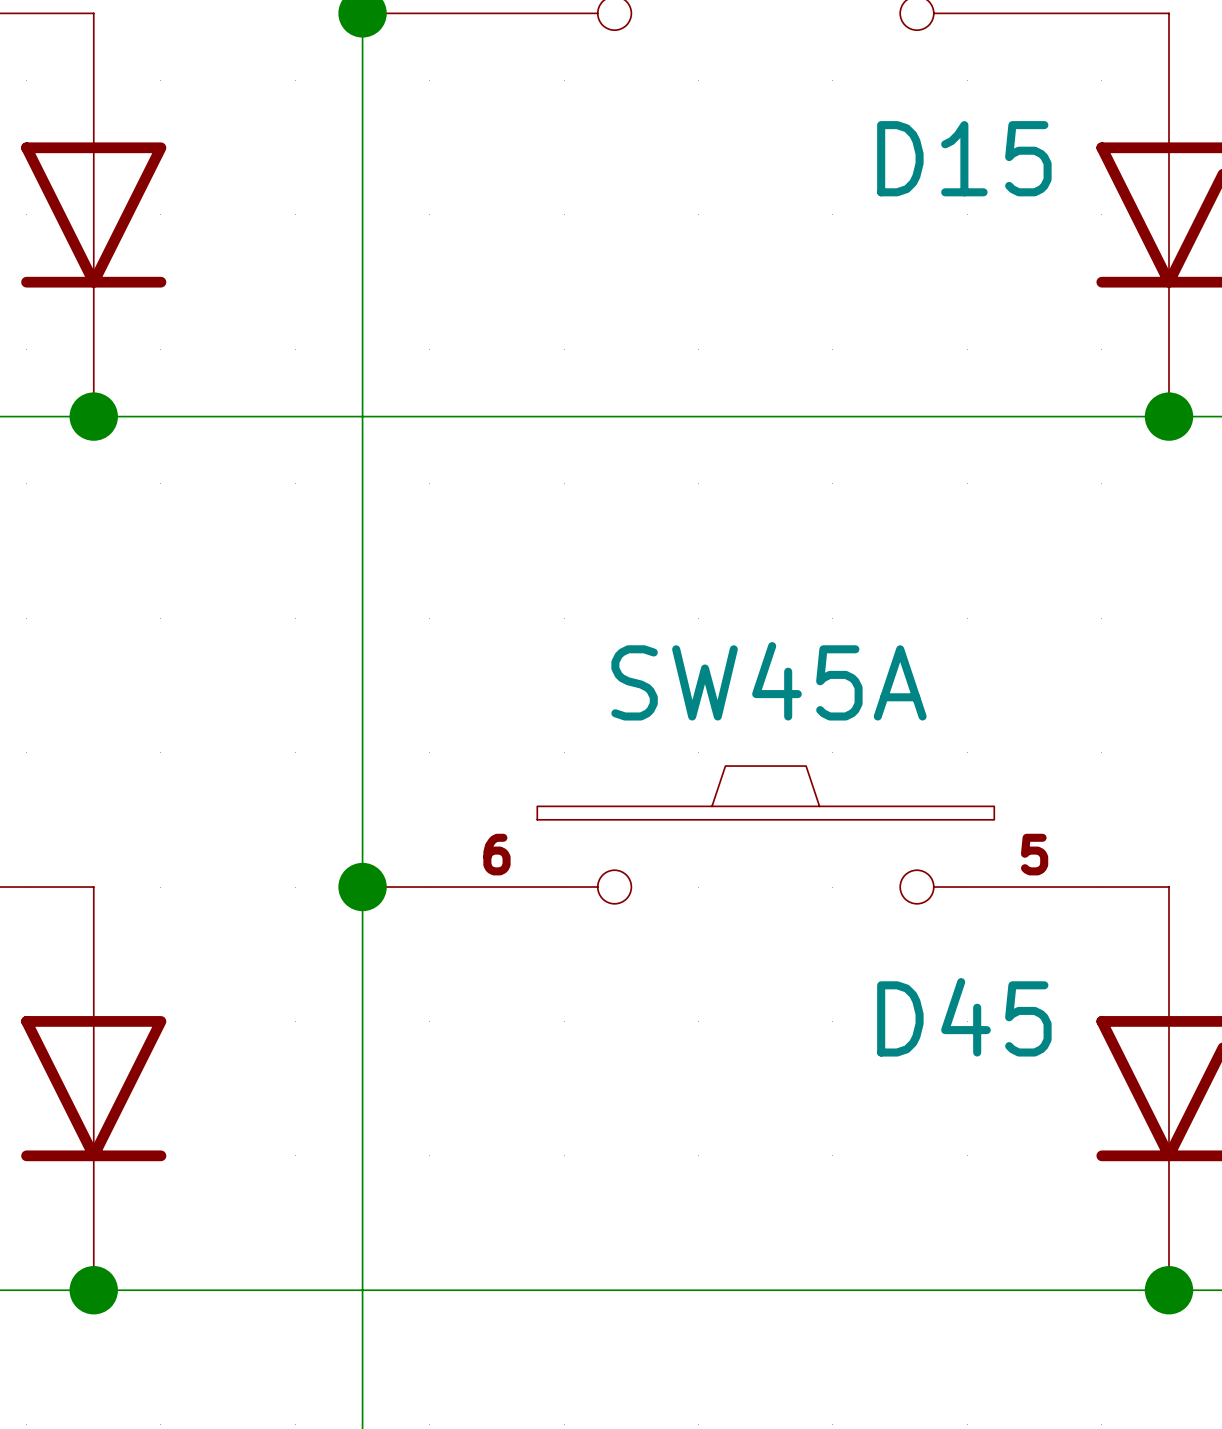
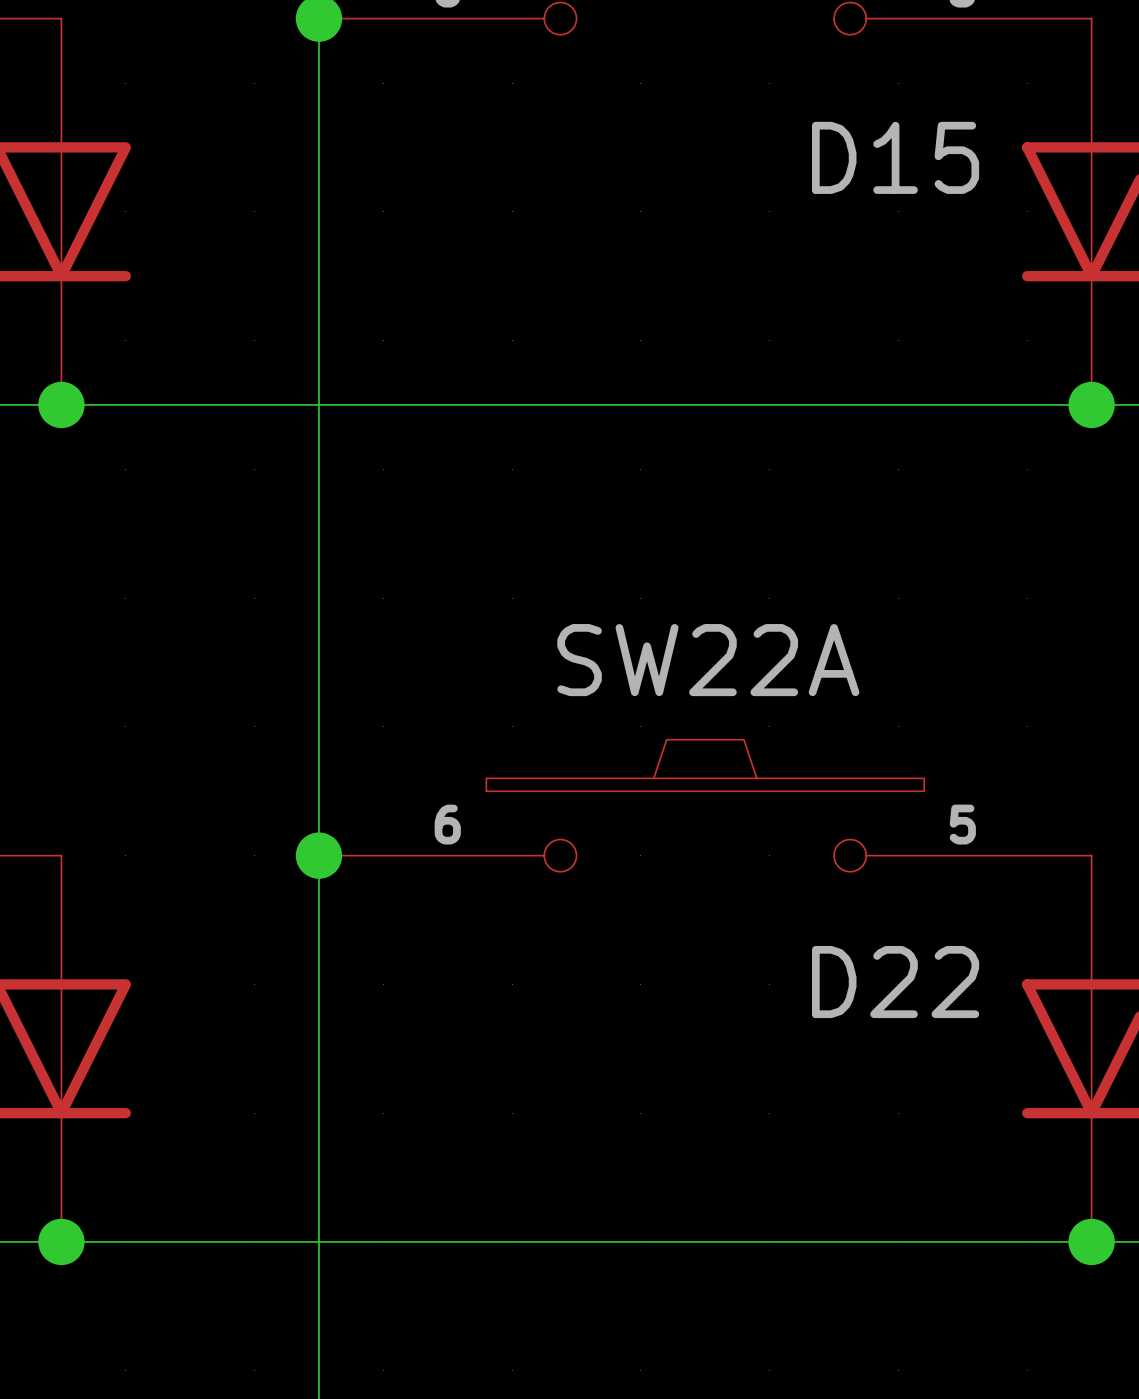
SW45A name: SW45A (768, 681) -> SW22A (708, 660)
D45 name: D45 (964, 1017) -> D22 (895, 982)

